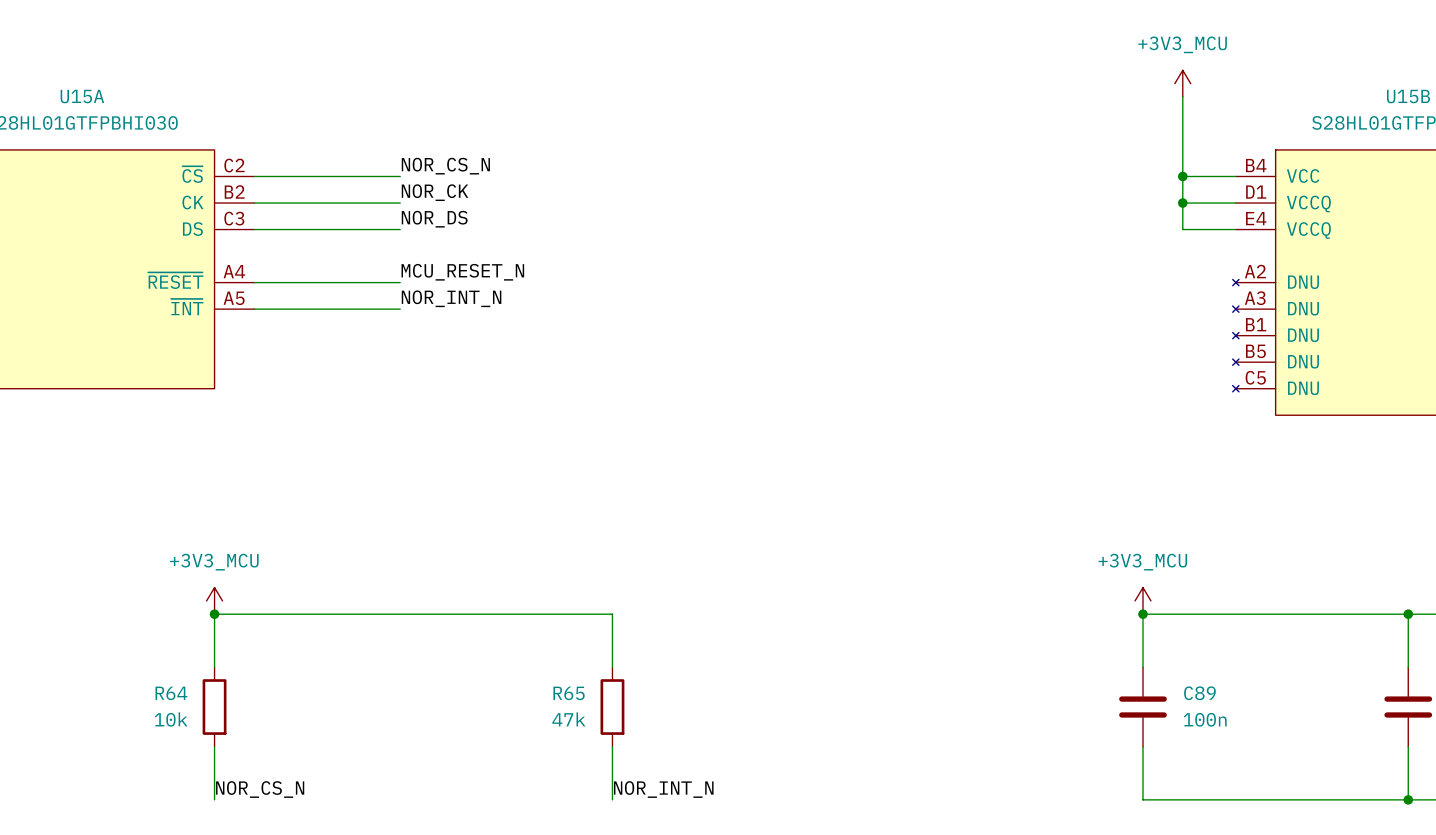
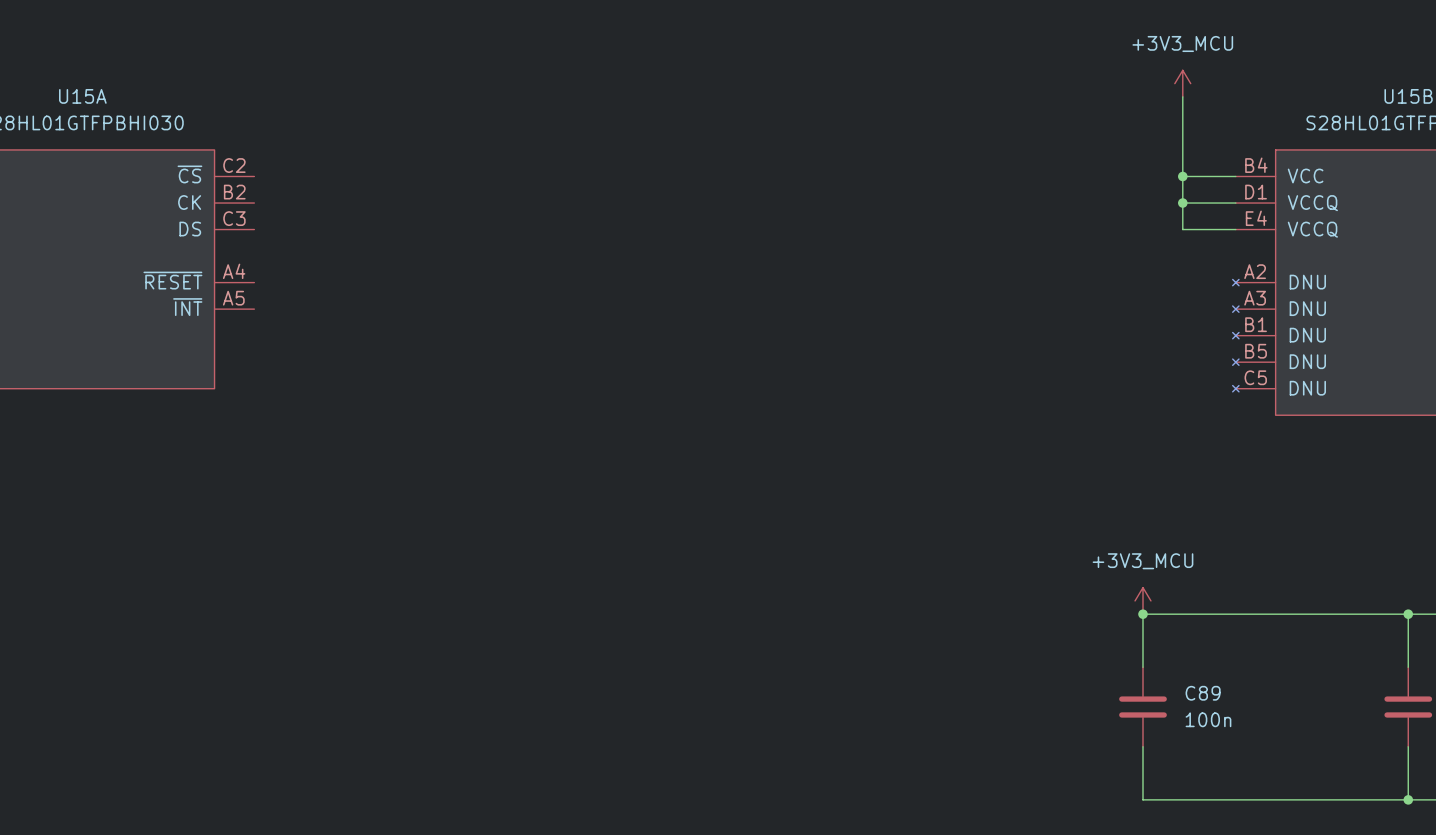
label: NOR_CS_N (445, 166) -> none
wire: (254, 176) (400, 176) -> none
label: NOR_CK (434, 192) -> none
wire: (254, 203) (400, 203) -> none
label: NOR_DS (434, 219) -> none
wire: (254, 229) (400, 229) -> none
label: MCU_RESET_N (462, 272) -> none
wire: (254, 282) (400, 282) -> none
label: NOR_INT_N (451, 298) -> none
wire: (254, 309) (400, 309) -> none
power symbol: +3V3_MCU (214, 600) -> none
junction: (214, 614) -> none
wire: (214, 667) (214, 614) (612, 614) (612, 667) -> none
R64: 10k (214, 707) -> none
R65: 47k (612, 707) -> none
wire: (214, 746) (214, 799) -> none
wire: (612, 746) (612, 799) -> none
label: NOR_CS_N (260, 789) -> none
label: NOR_INT_N (663, 789) -> none

